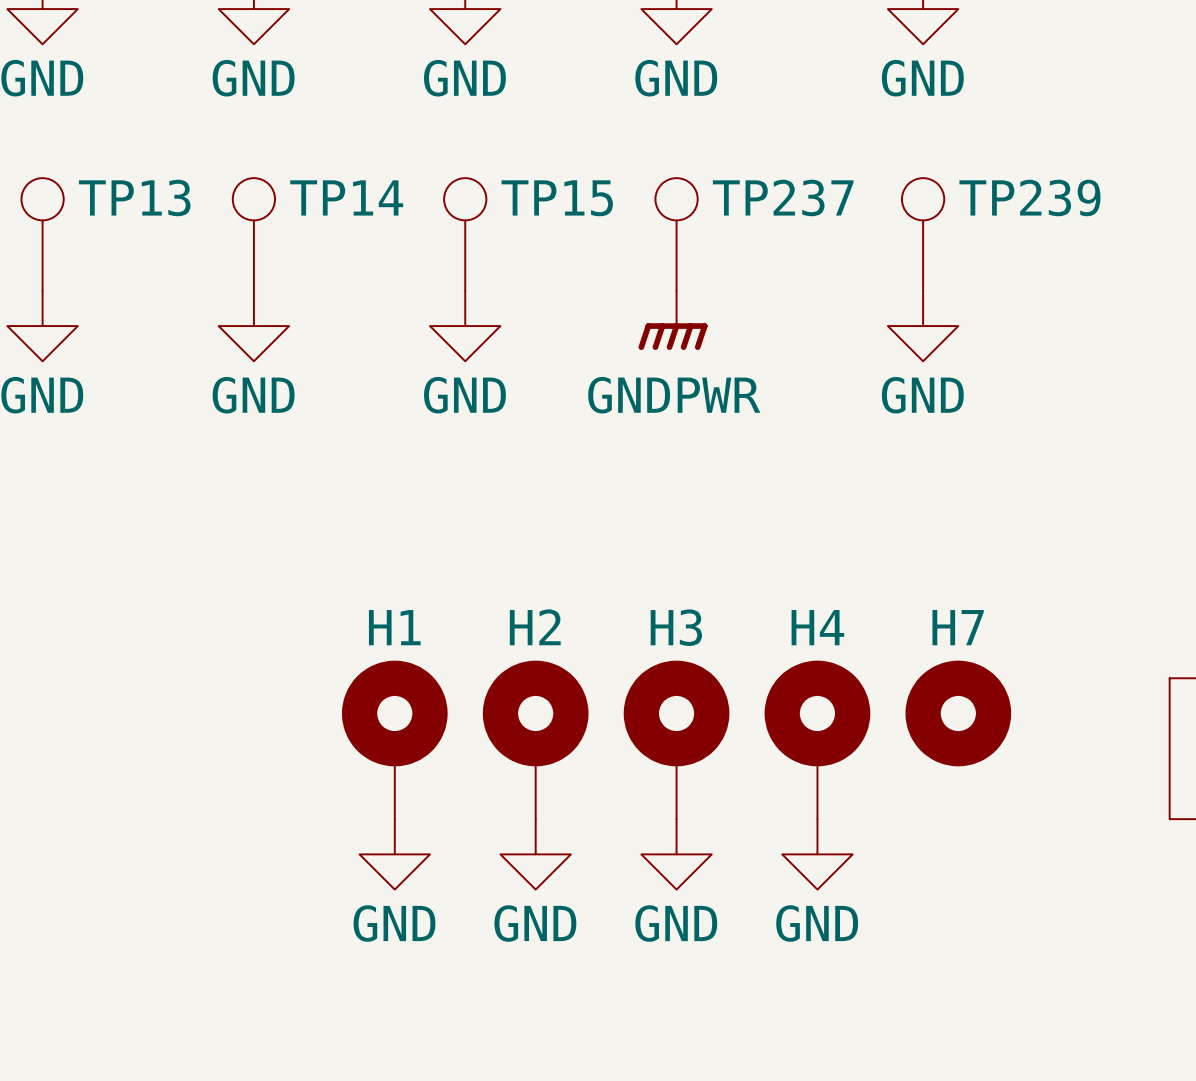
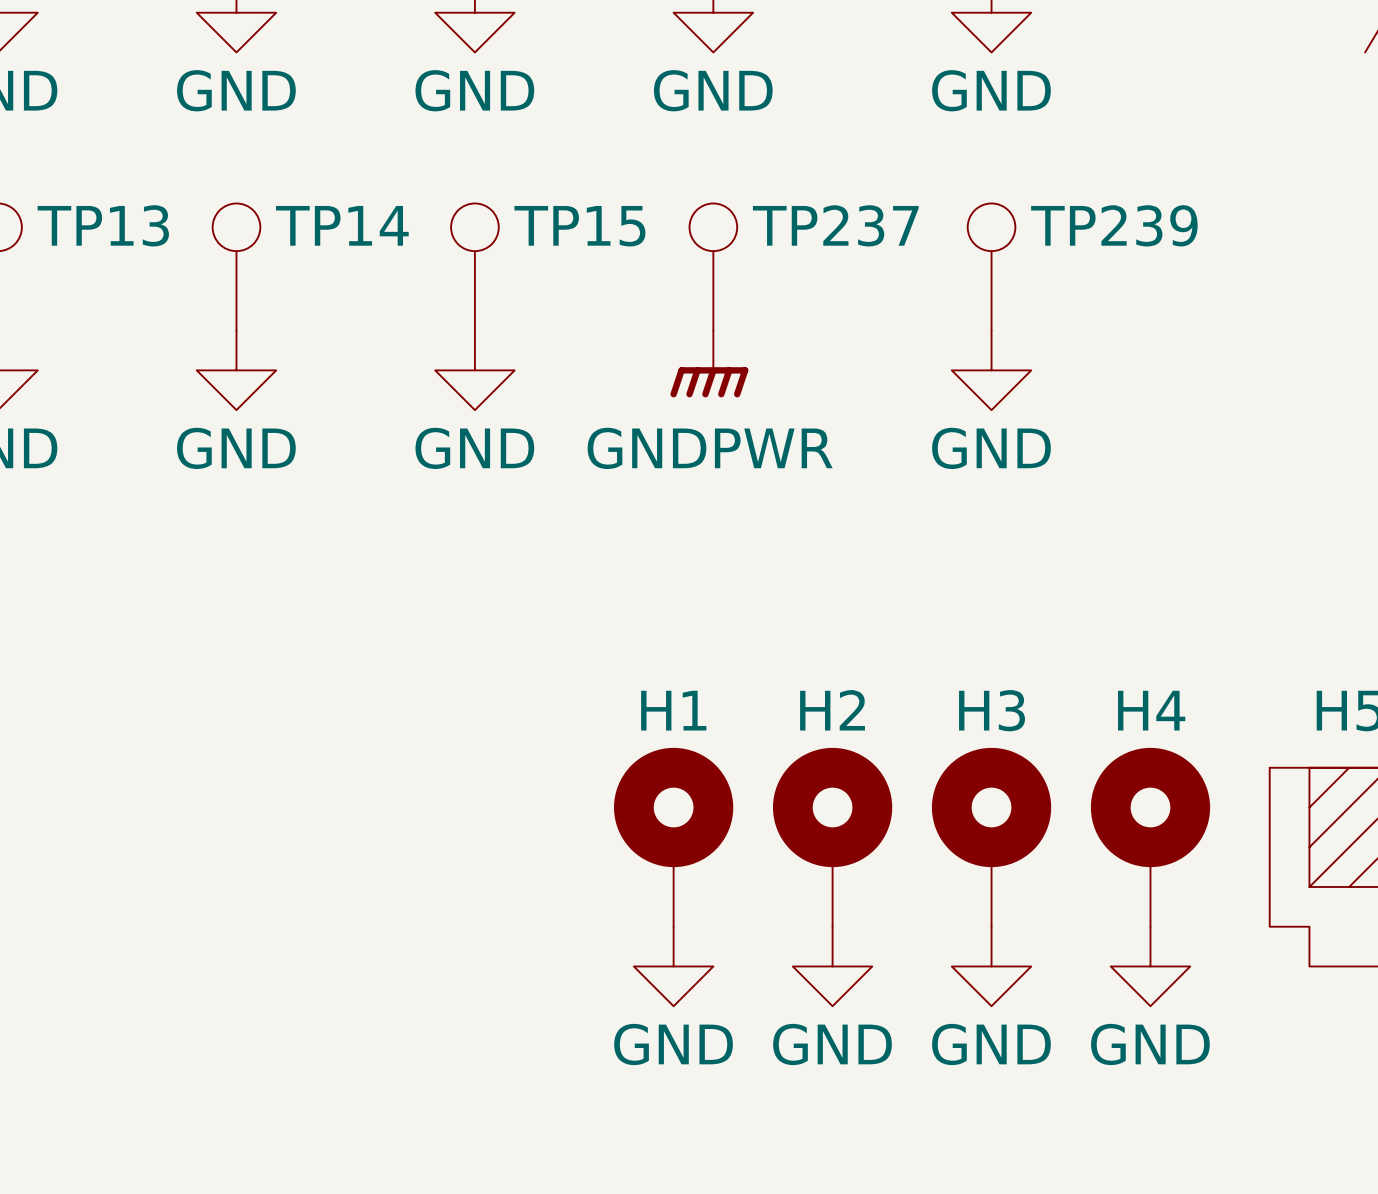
H7: (958, 713) -> none
H1 position: (394, 739) -> (673, 837)
H2 position: (535, 739) -> (832, 837)
H3 position: (676, 739) -> (991, 837)
H4 position: (817, 739) -> (1150, 837)
power symbol: GND (394, 854) -> none
power symbol: GND (535, 854) -> none
power symbol position: GND (676, 854) -> GND (673, 966)
power symbol position: GND (817, 854) -> GND (832, 966)
power symbol: none -> GND (991, 966)
power symbol: none -> GND (1150, 966)

